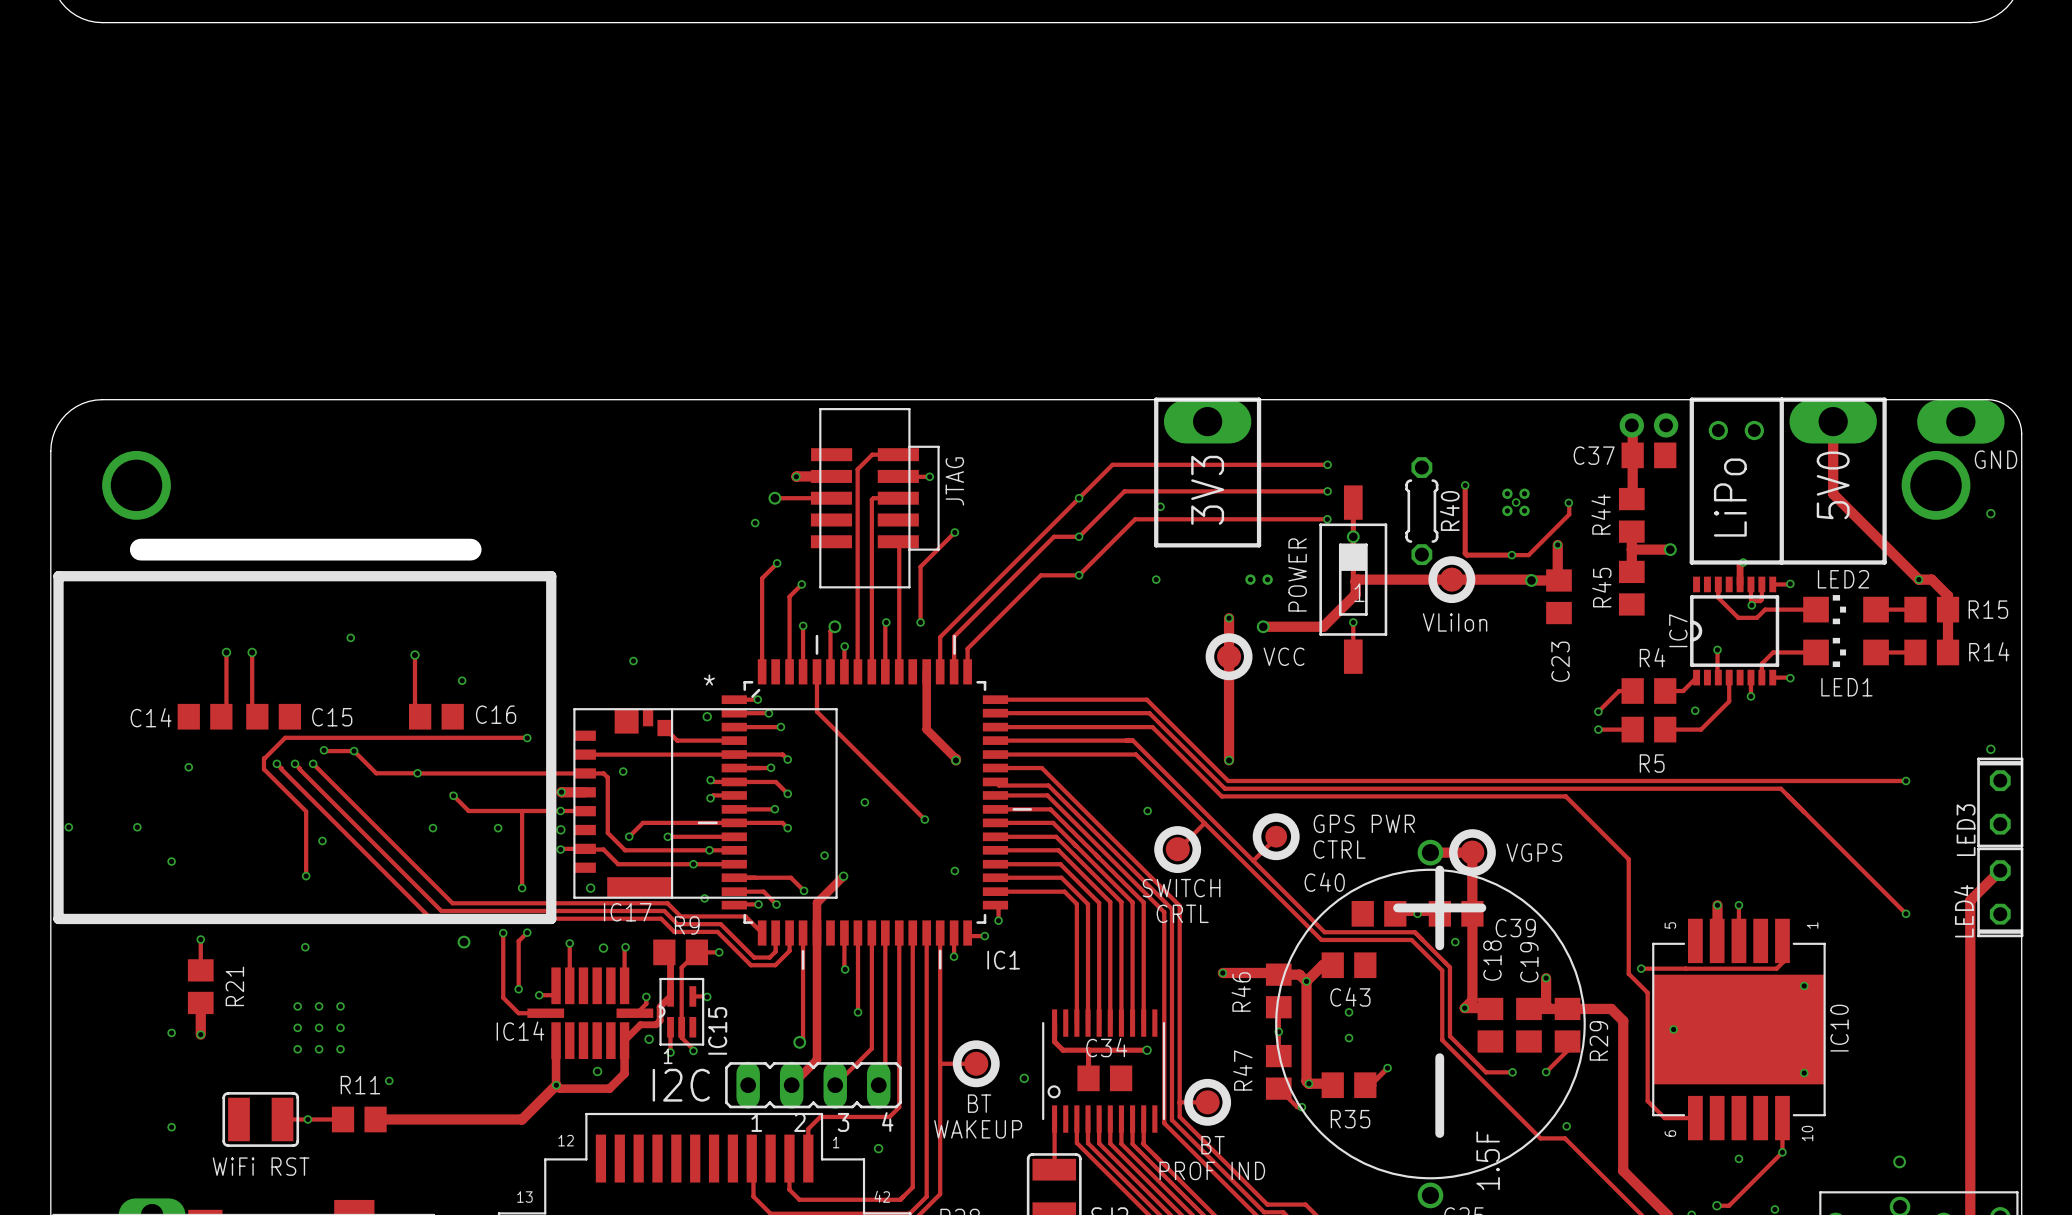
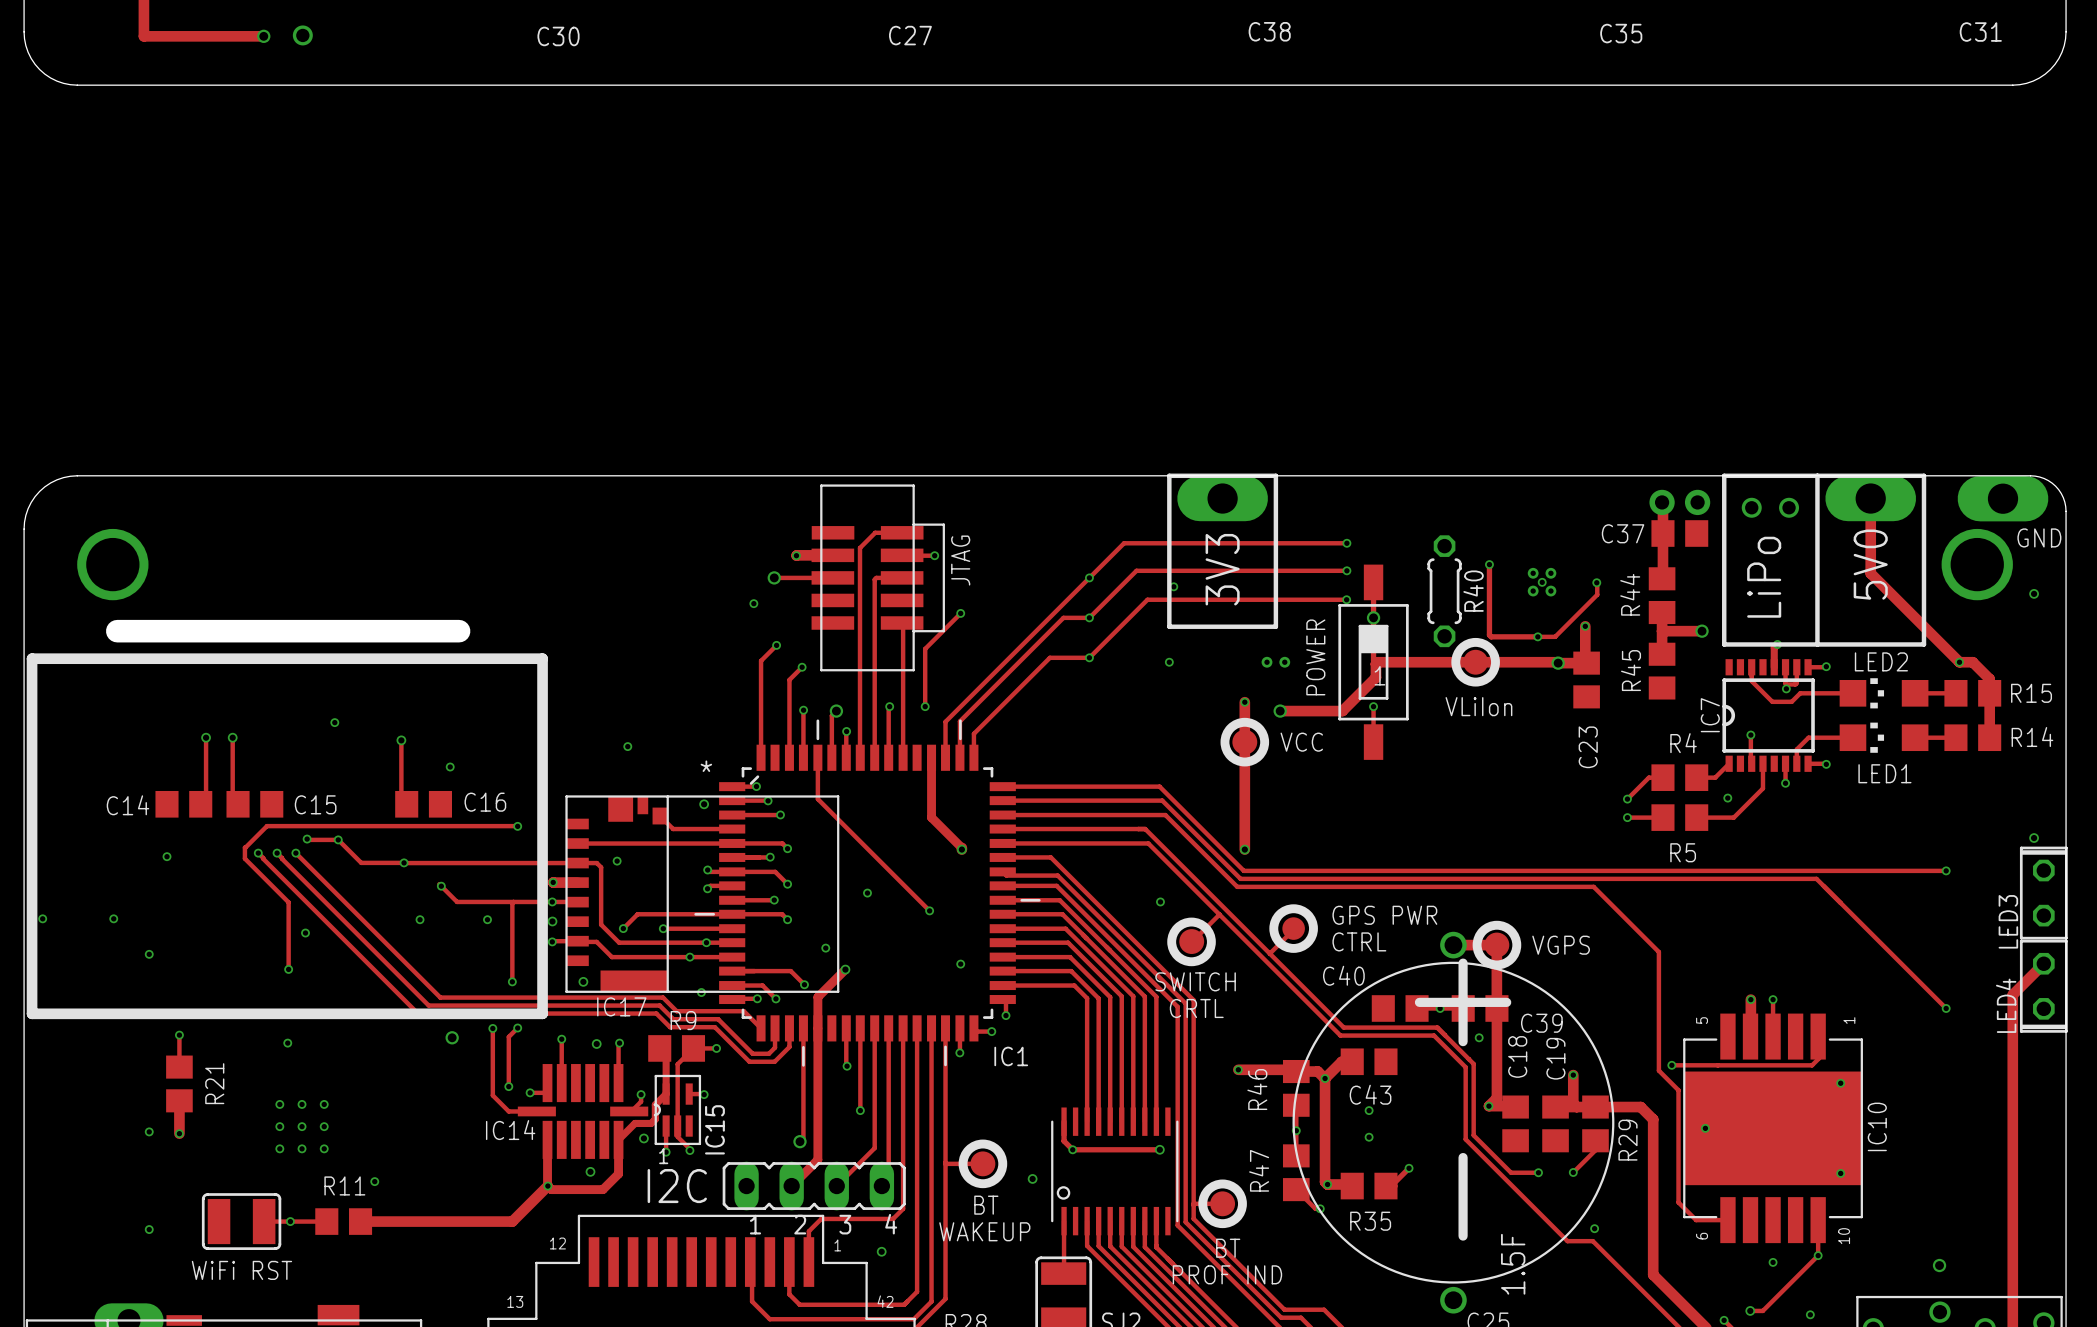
via: none -> (1072, 1149)
track: (1088, 1050) (1088, 1078) -> none
C34: (1104, 1078) -> none

